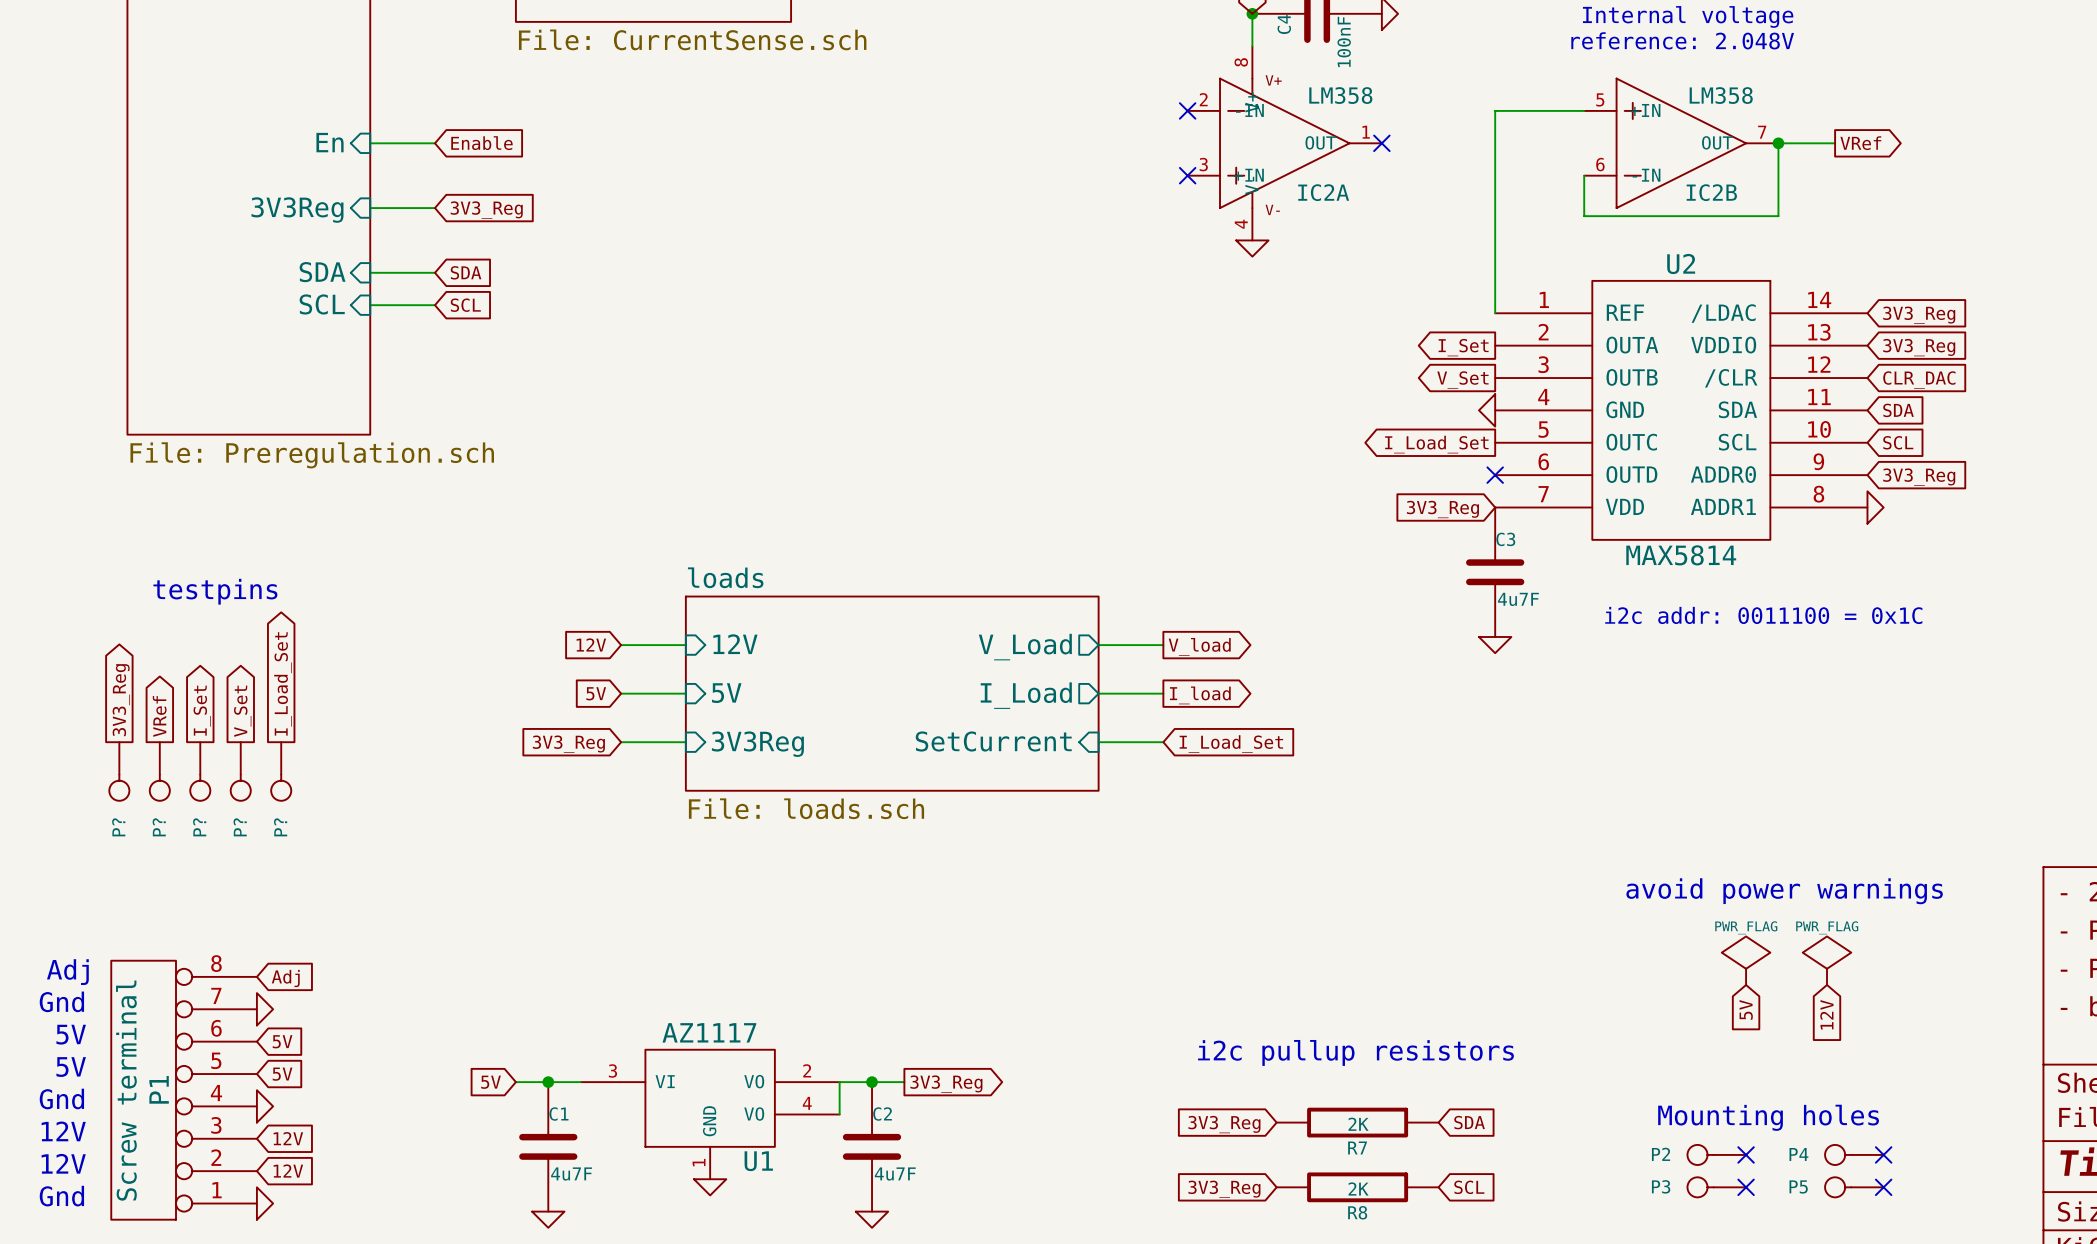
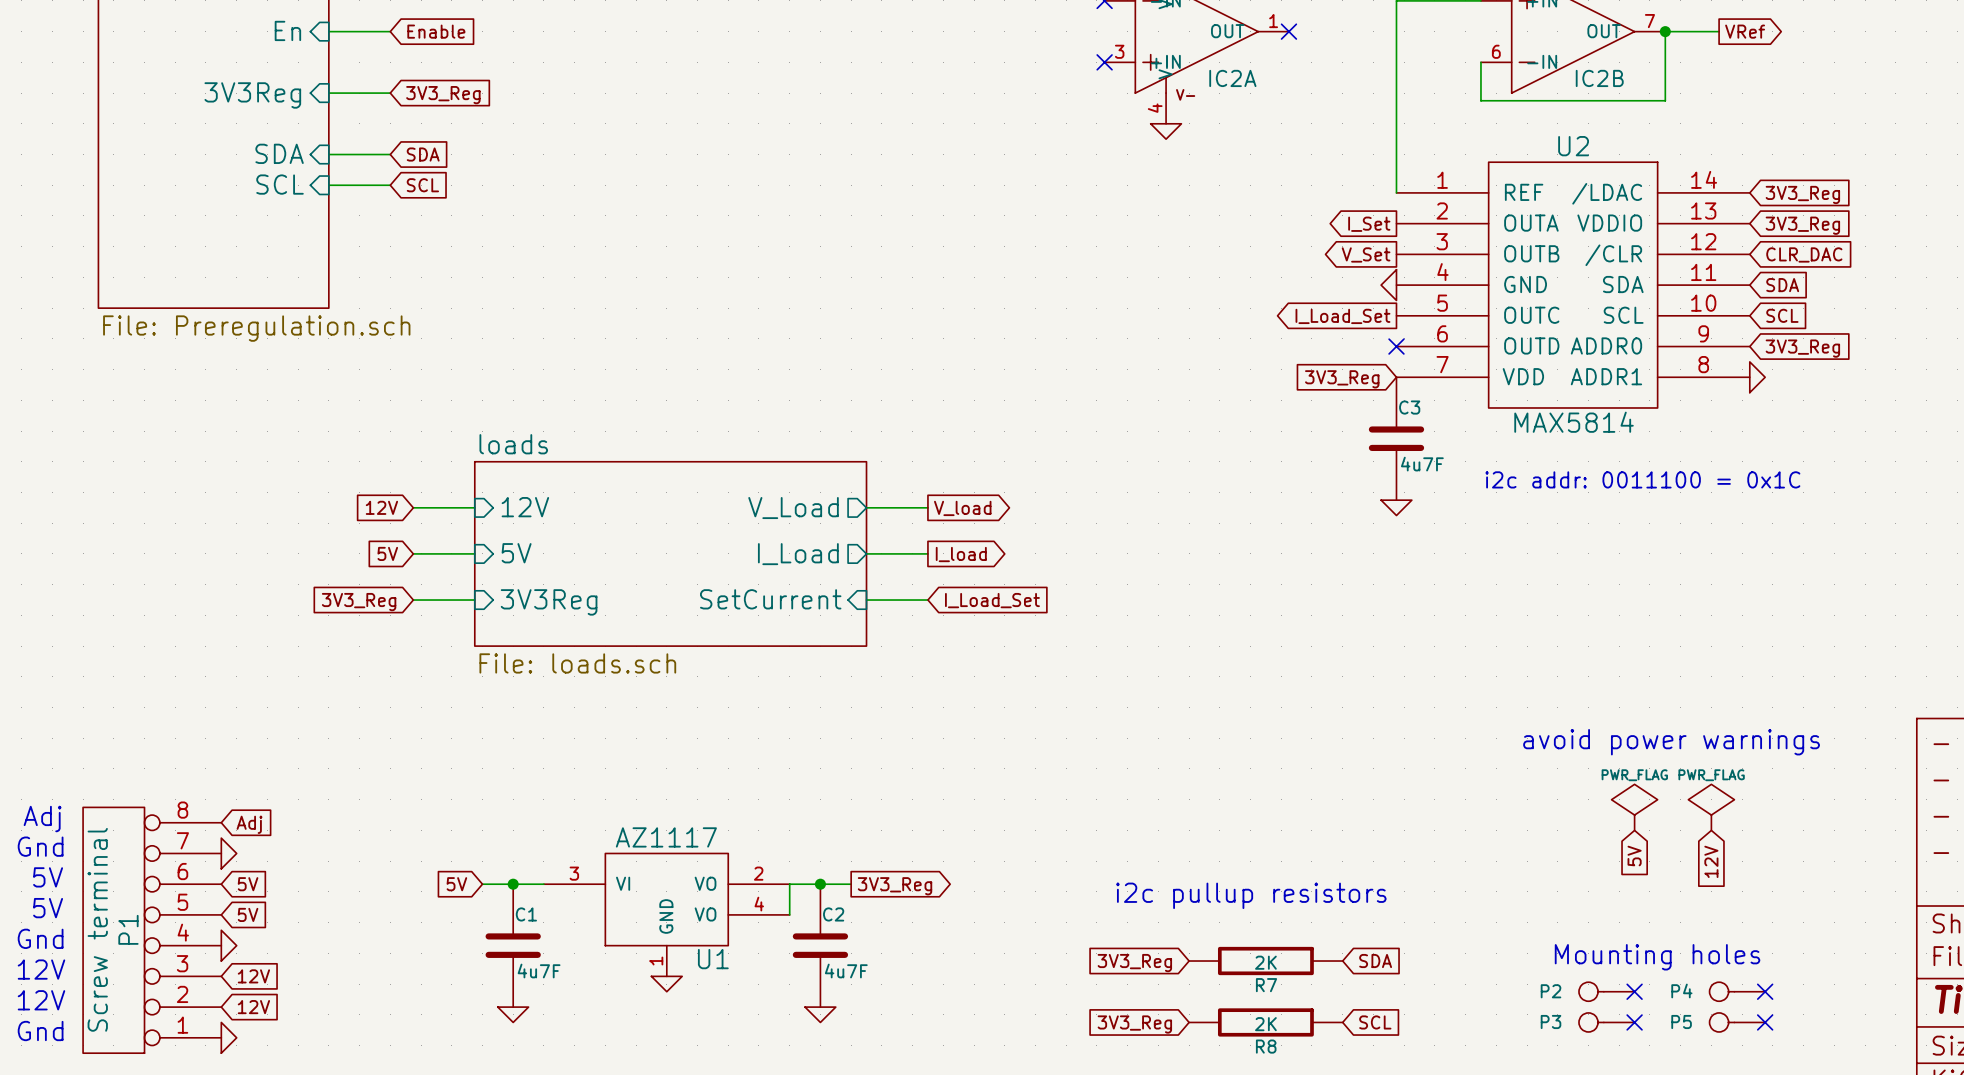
text: testpins (215, 591) -> none
global label position: 12V (591, 644) -> 12V (381, 507)
sheet pin position: 12V (735, 644) -> 12V (525, 507)
wire: (621, 645) (685, 645) -> (413, 507) (474, 507)
wire: (1098, 645) (1163, 645) -> (866, 507) (927, 507)
global label position: V_load (1199, 646) -> V_load (962, 508)
sheet pin position: V_Load (1025, 647) -> V_Load (793, 508)
global label: I_Load_Set (283, 683) -> none
global label position: 5V (596, 693) -> 5V (387, 553)
wire: (621, 693) (685, 693) -> (413, 553) (474, 553)
sheet pin position: 5V (726, 693) -> 5V (516, 553)
sheet loads position: (892, 693) -> (670, 553)
wire: (1098, 693) (1163, 693) -> (866, 553) (927, 553)
sheet pin position: I_Load (1026, 695) -> I_Load (798, 554)
global label position: I_load (1200, 695) -> I_load (961, 554)
global label: 3V3_Reg (121, 700) -> none
global label: I_Set (202, 710) -> none
global label: V_Set (242, 711) -> none
global label: VRef (159, 716) -> none
sheet pin position: SetCurrent (993, 741) -> SetCurrent (770, 599)
wire: (621, 742) (685, 742) -> (413, 600) (474, 600)
wire: (1098, 742) (1163, 742) -> (866, 600) (927, 600)
global label position: 3V3_Reg (568, 744) -> 3V3_Reg (359, 602)
sheet pin position: 3V3Reg (757, 744) -> 3V3Reg (549, 602)
global label position: I_Load_Set (1231, 744) -> I_Load_Set (992, 600)
P?: (119, 771) -> none
P?: (159, 771) -> none
P?: (200, 771) -> none
P?: (240, 771) -> none
P?: (281, 771) -> none
global label position: 5V (491, 1082) -> 5V (456, 884)
wire: (515, 1082) (580, 1082) -> (482, 884) (543, 884)
junction position: (548, 1082) -> (513, 884)
junction position: (872, 1082) -> (820, 884)
wire: (904, 1082) (839, 1082) (839, 1114) -> (851, 884) (789, 884) (789, 914)
global label position: 3V3_Reg (946, 1084) -> 3V3_Reg (895, 886)
U1 position: (710, 1114) -> (666, 914)
C1 position: (548, 1146) -> (513, 945)
C2 position: (872, 1146) -> (820, 945)
power symbol position: (710, 1187) -> (666, 984)
power symbol position: (548, 1219) -> (513, 1014)
power symbol position: (872, 1219) -> (820, 1014)

